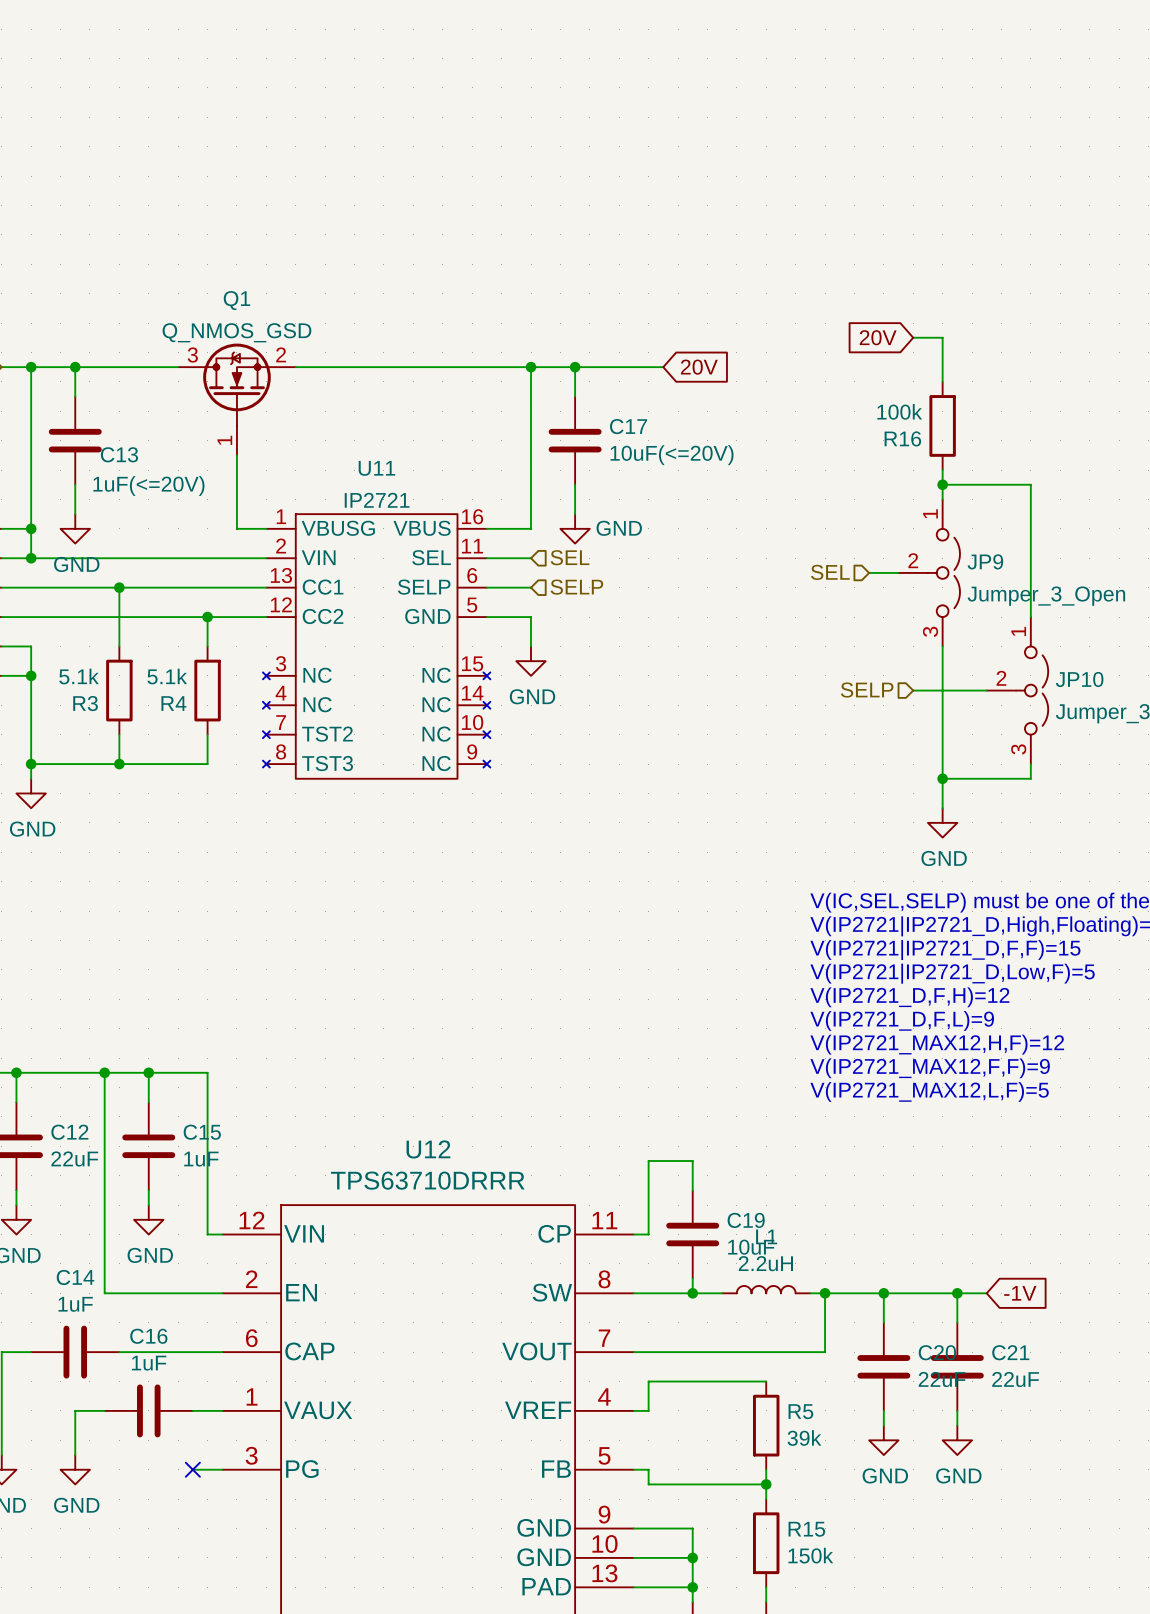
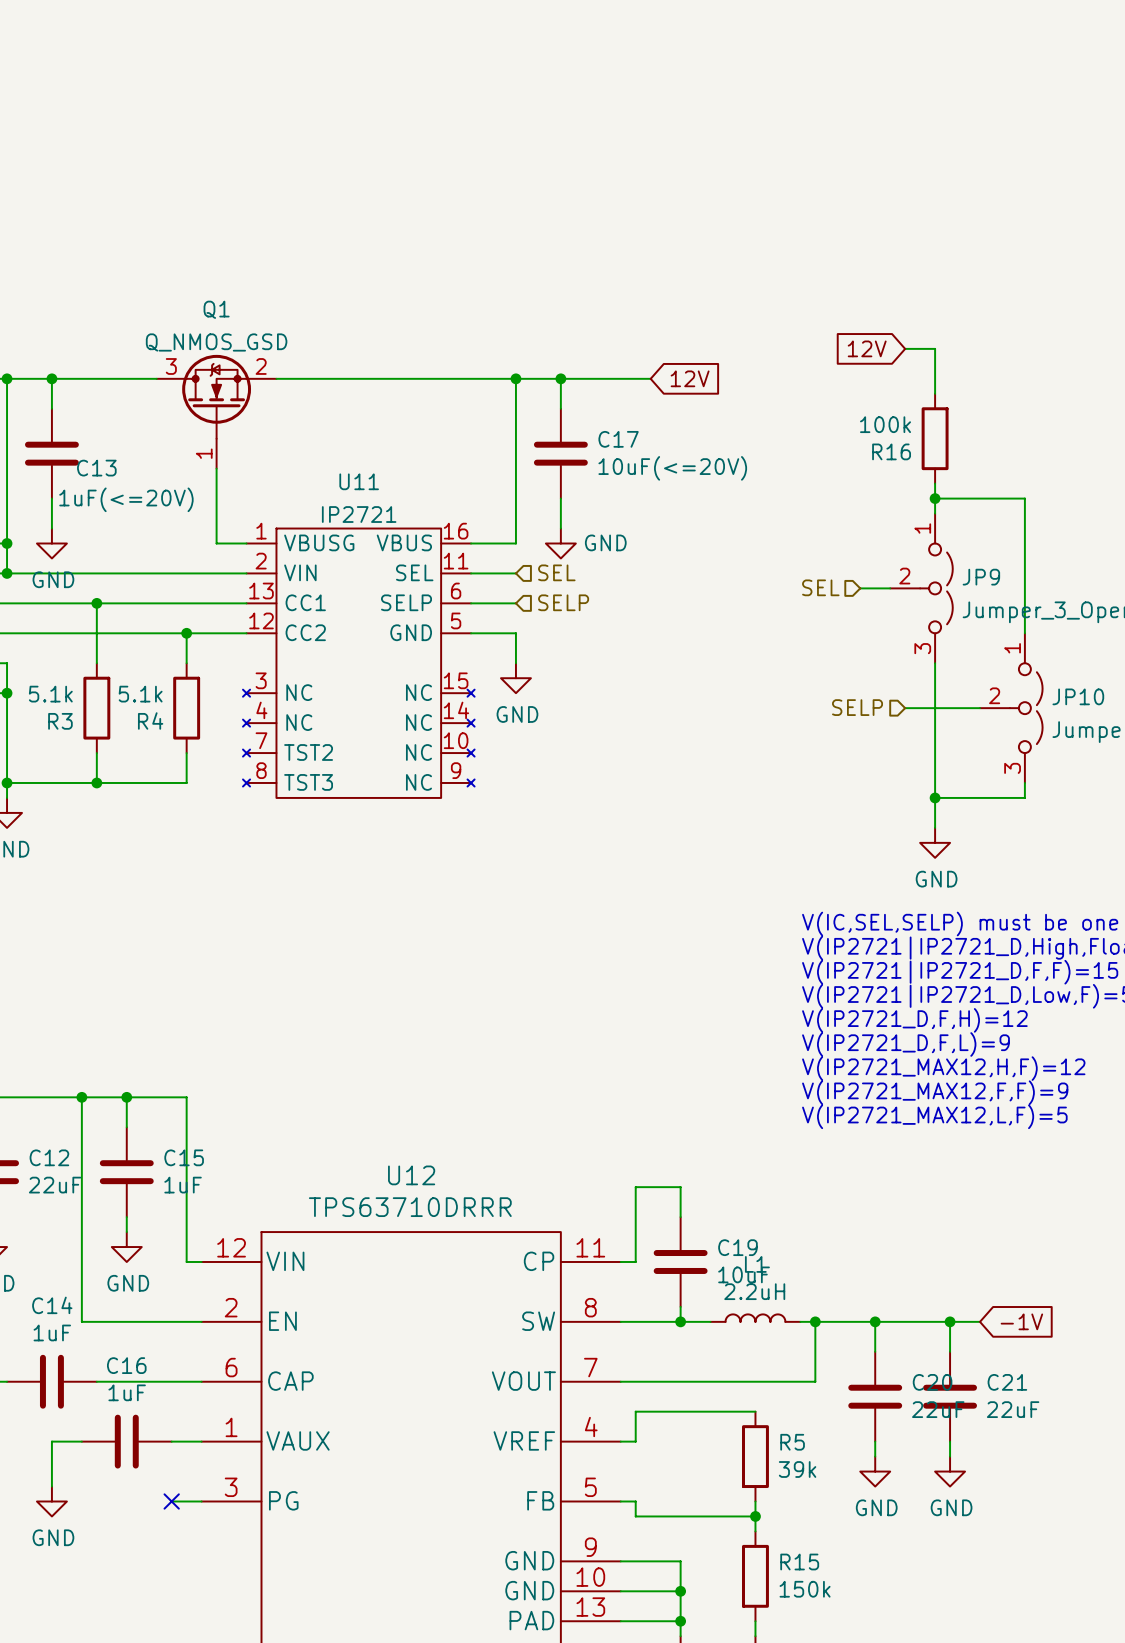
global label: 20V (878, 337) -> 12V (867, 348)
global label: 20V (699, 367) -> 12V (690, 378)

